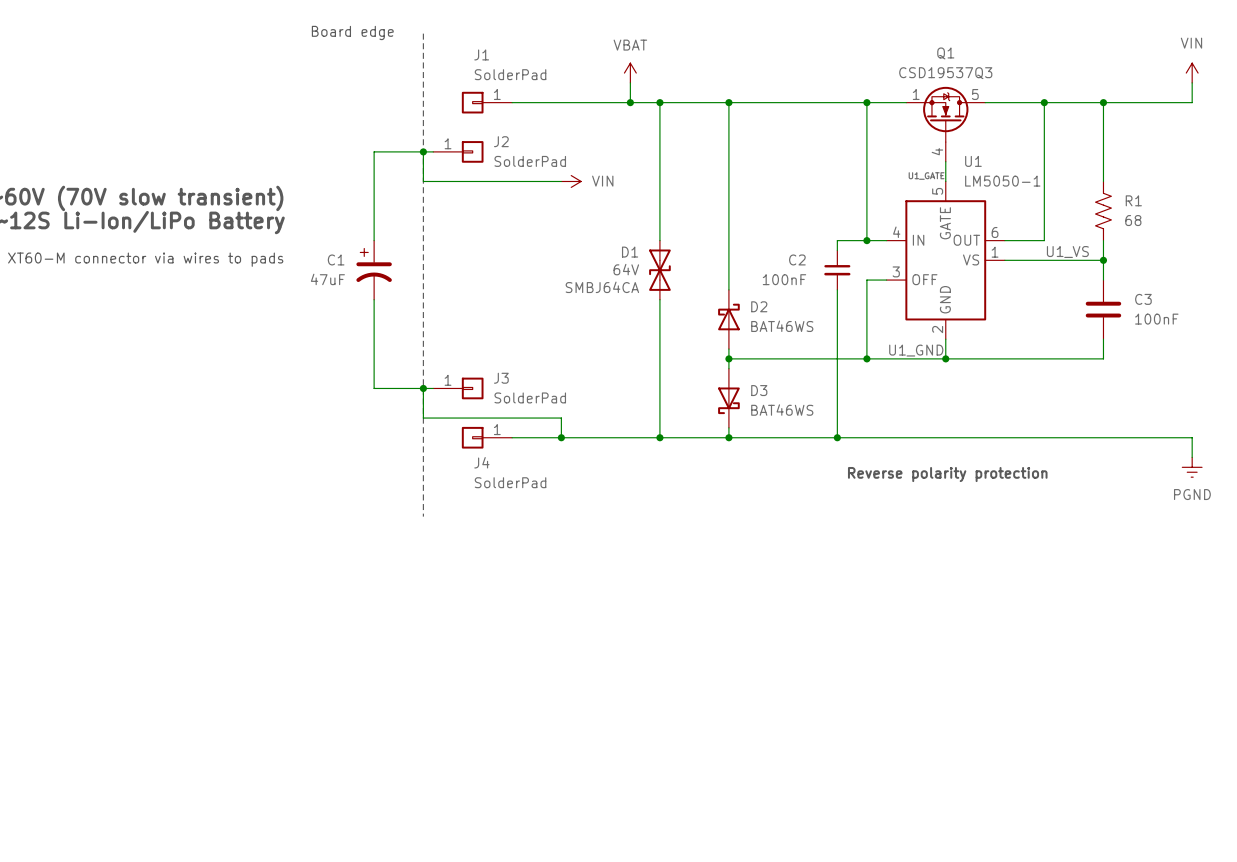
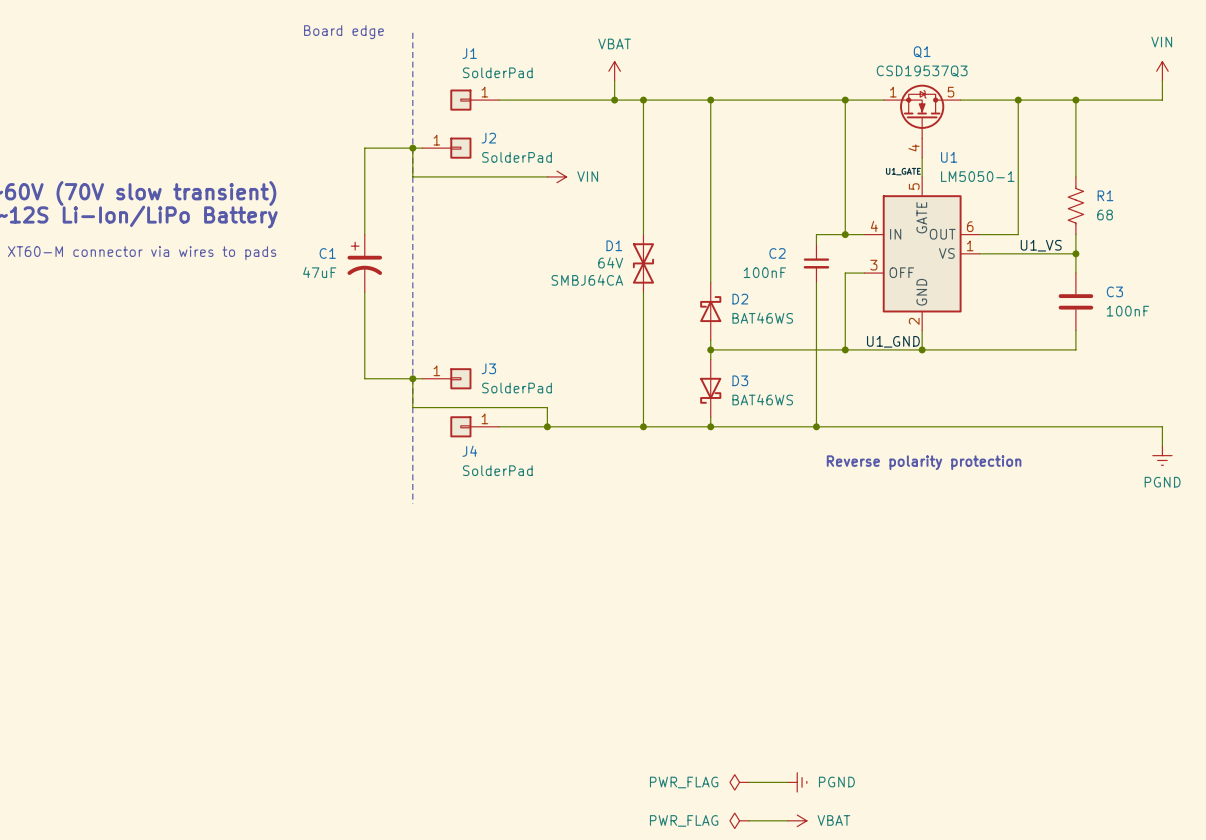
power symbol: none -> PWR_FLAG (739, 782)
wire: none -> (749, 782) (787, 782)
power symbol: none -> PGND (797, 782)
power symbol: none -> PWR_FLAG (739, 820)
wire: none -> (749, 820) (787, 820)
power symbol: none -> VBAT (797, 820)

